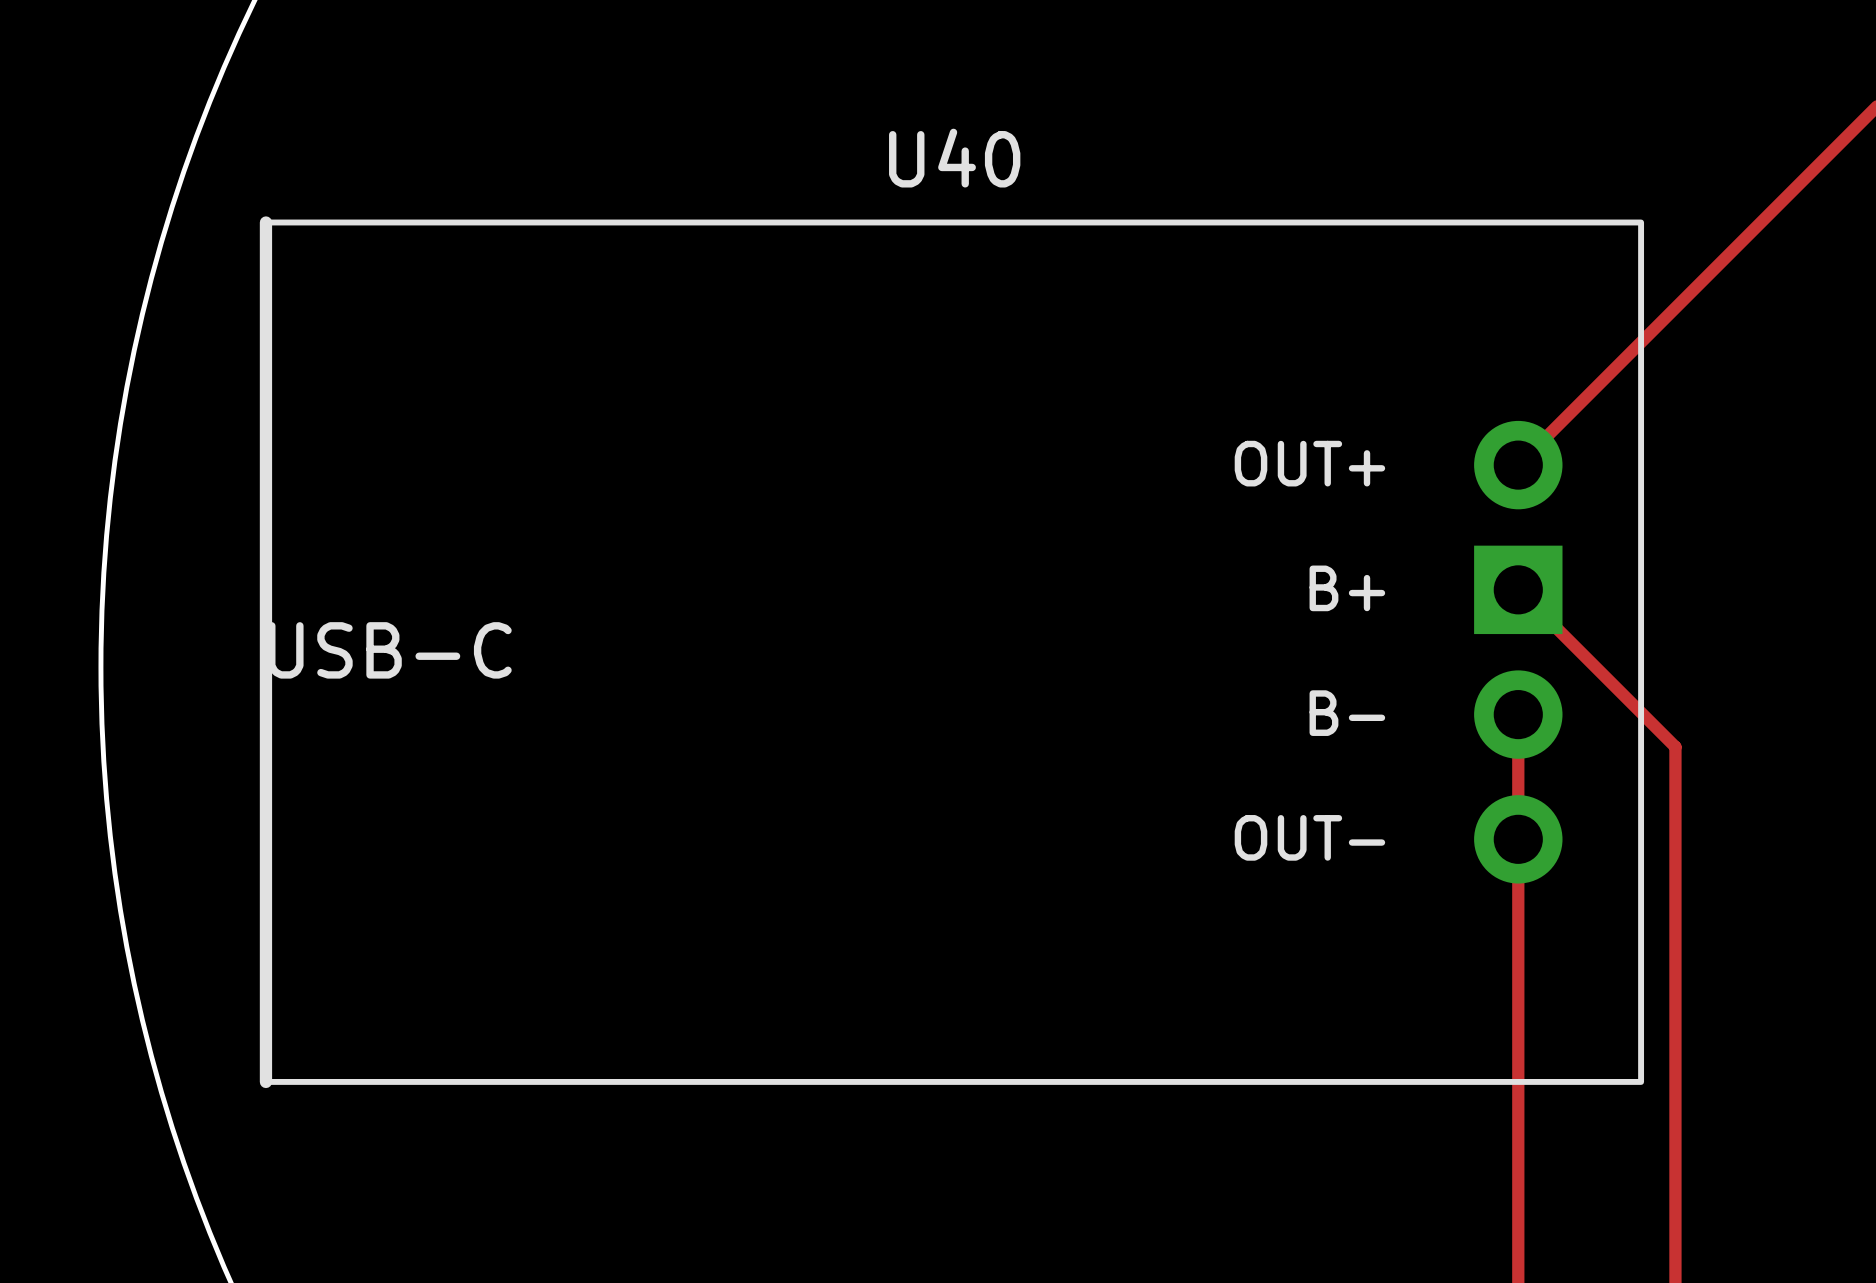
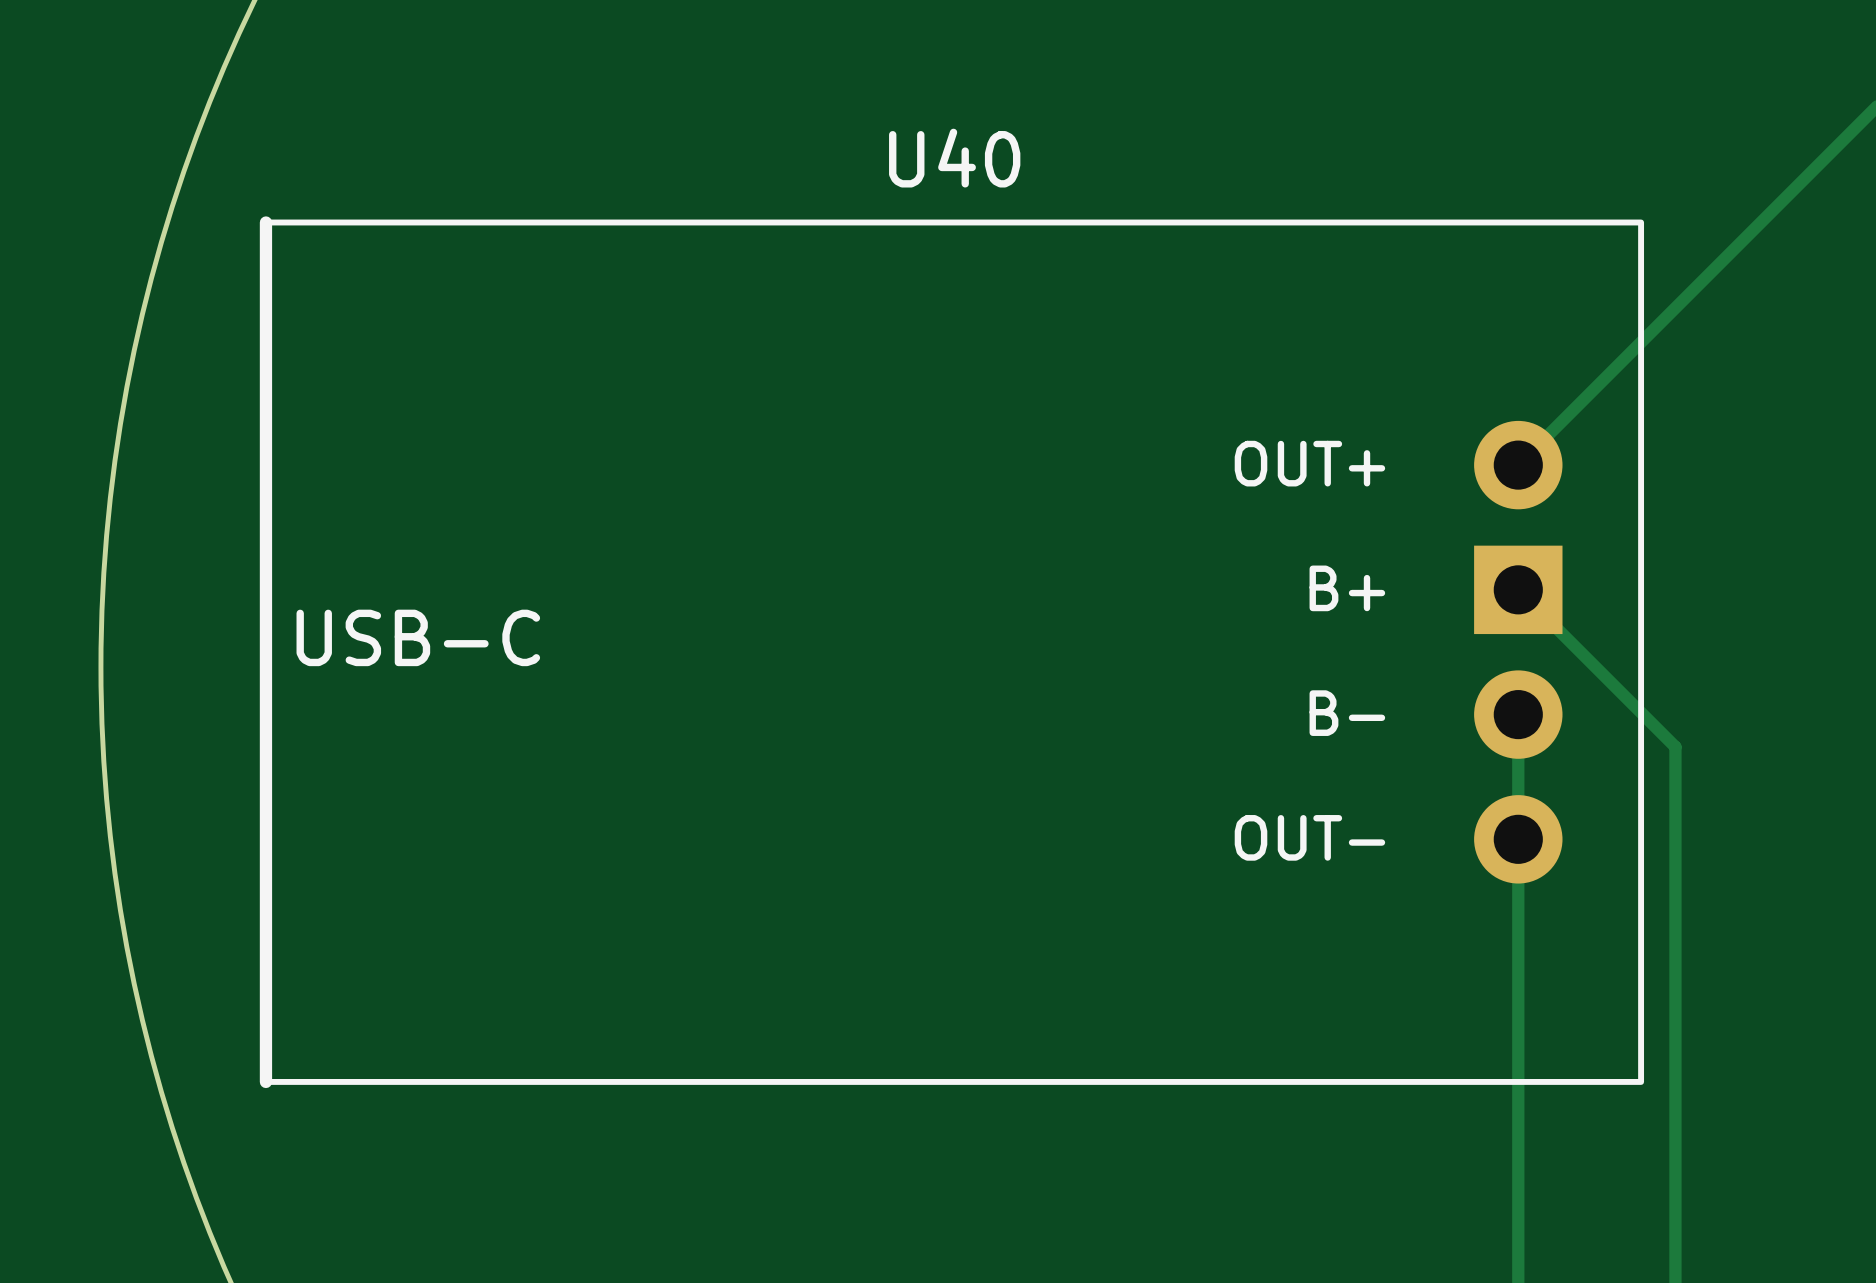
U40 text position: USB-C (389, 650) -> USB-C (418, 637)

